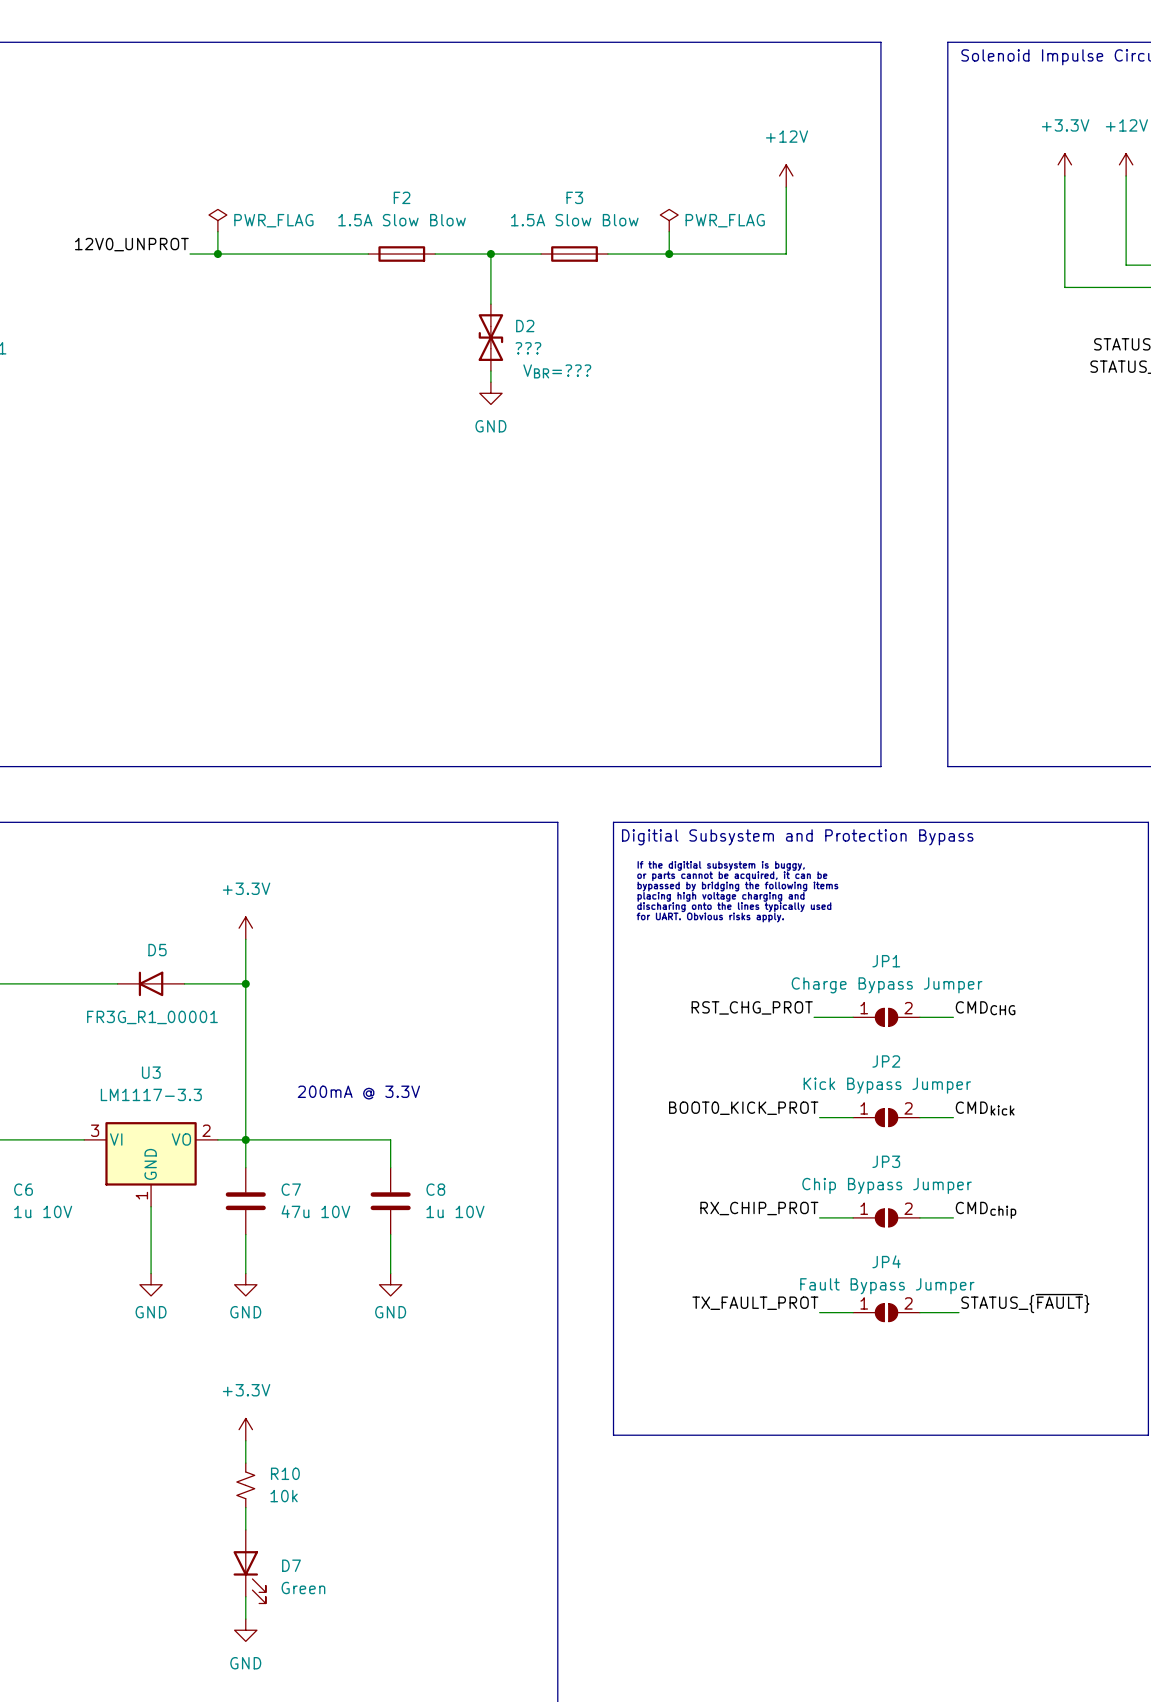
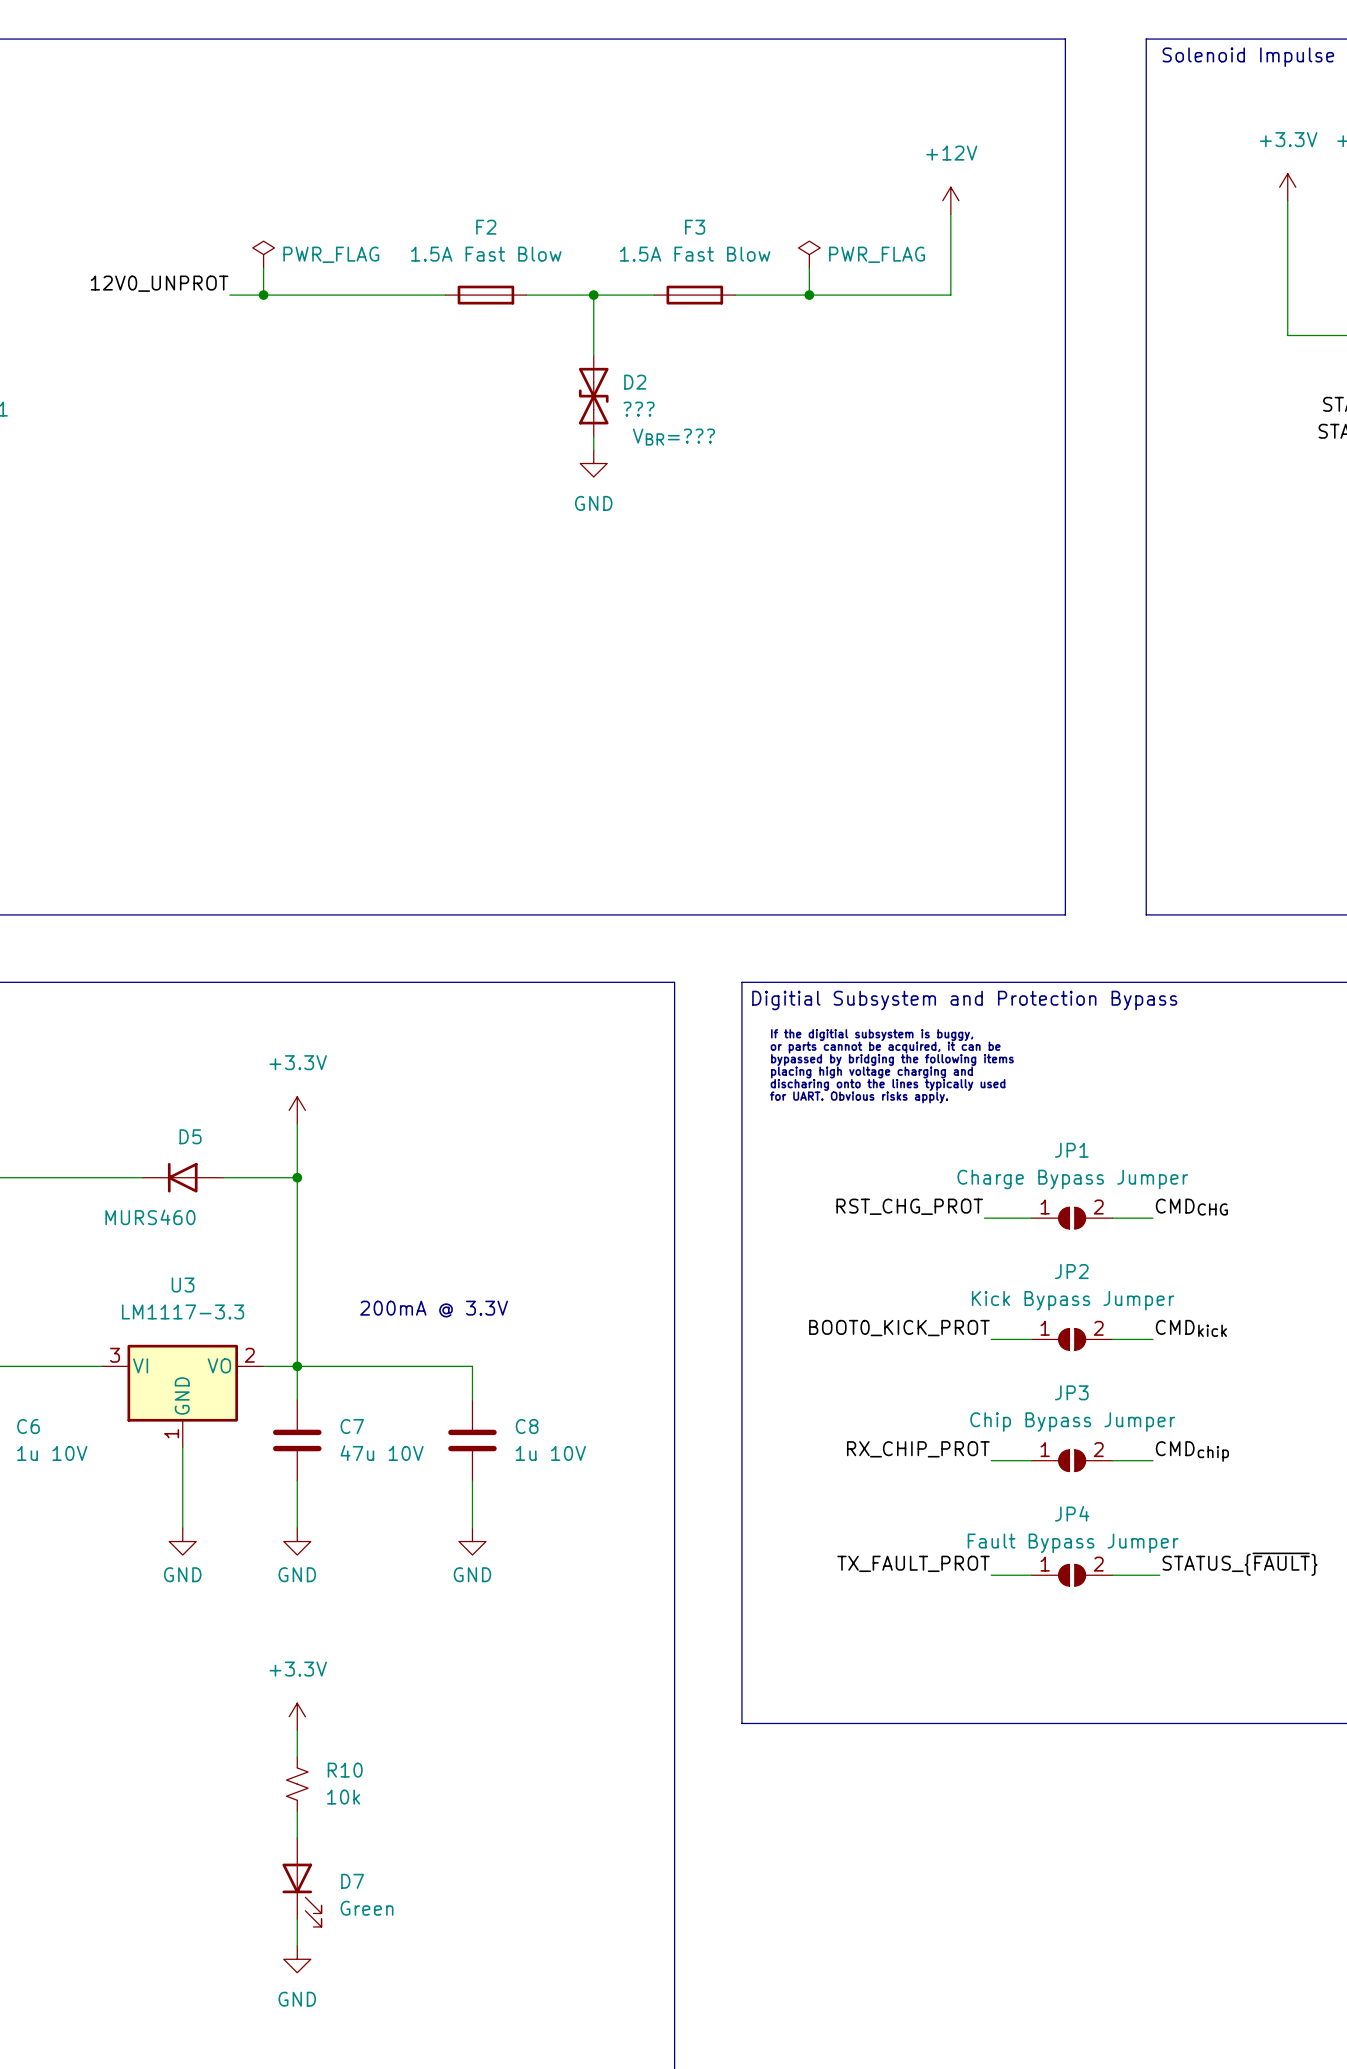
F2 value: 1.5A Slow Blow (402, 220) -> 1.5A Fast Blow (486, 254)
F3 value: 1.5A Slow Blow (574, 220) -> 1.5A Fast Blow (695, 254)
D5 value: FR3G_R1_00001 (152, 1017) -> MURS460 (150, 1217)

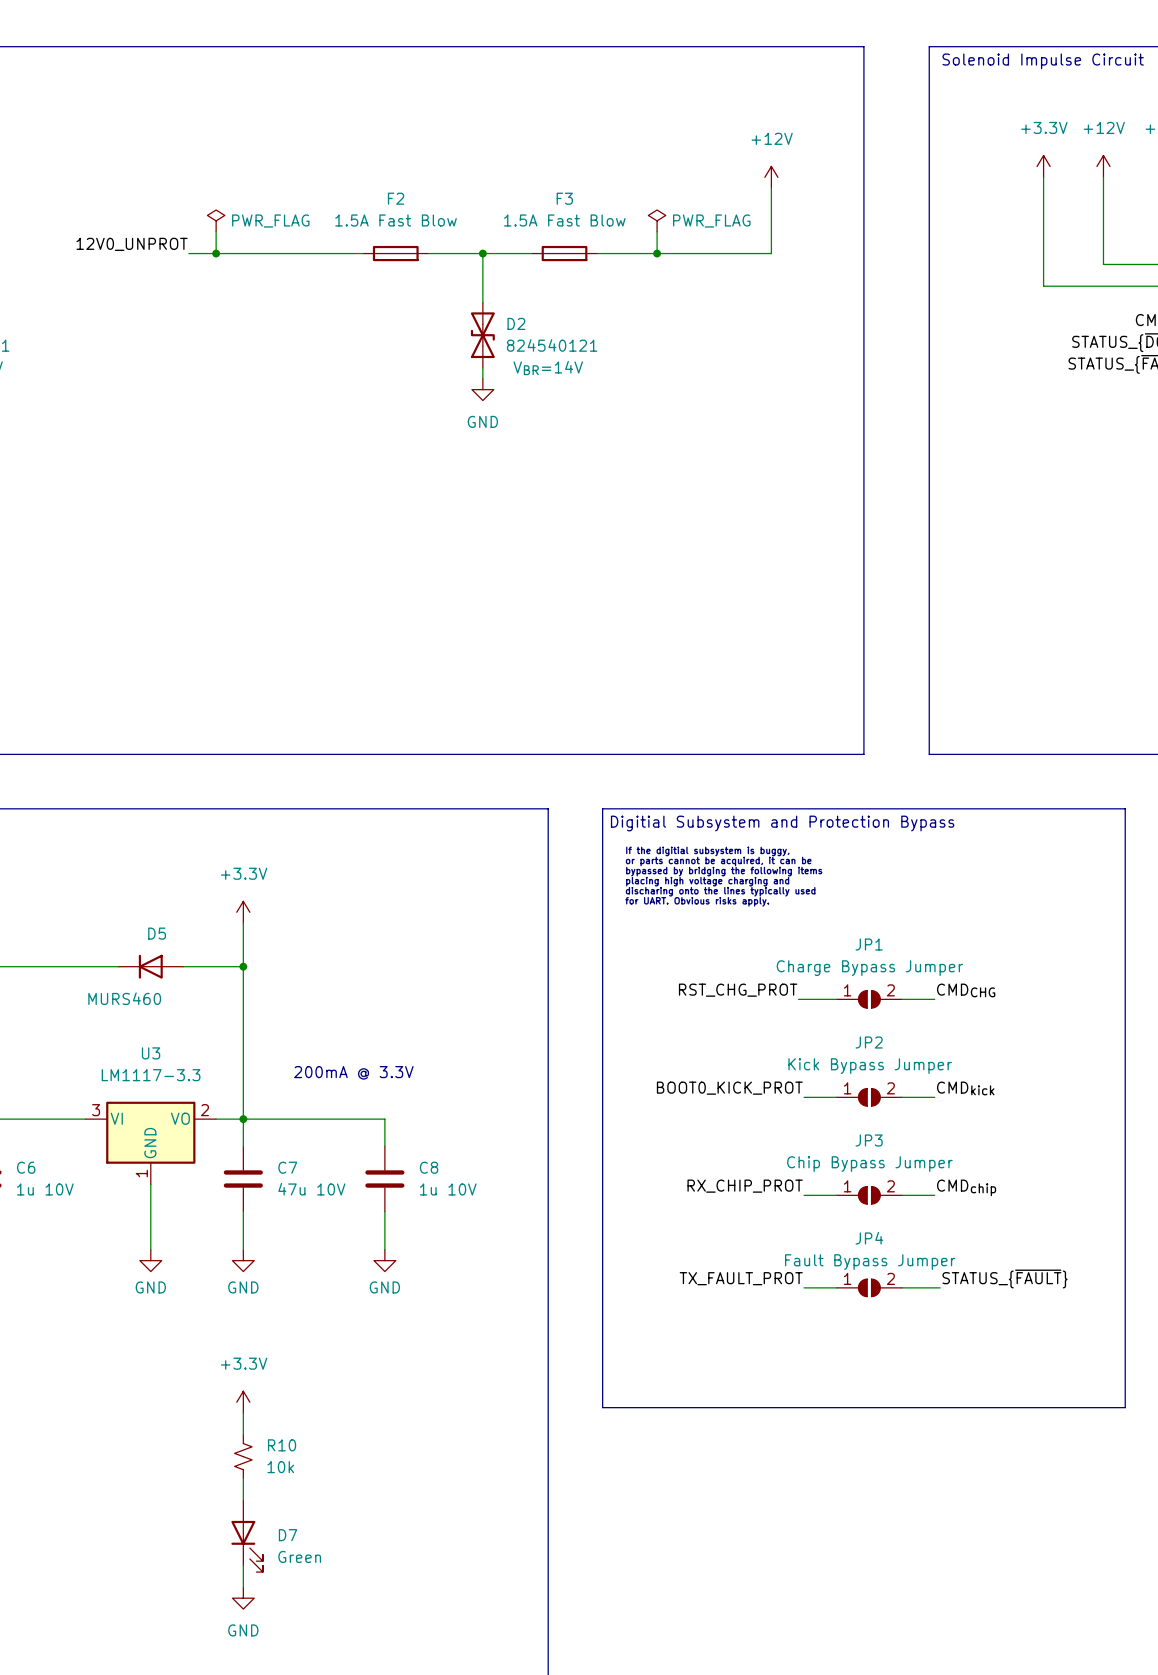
D2 value: ??? (639, 409) -> 824540121 (552, 345)
D2 text: VBR=??? (673, 437) -> VBR=14V (548, 368)

